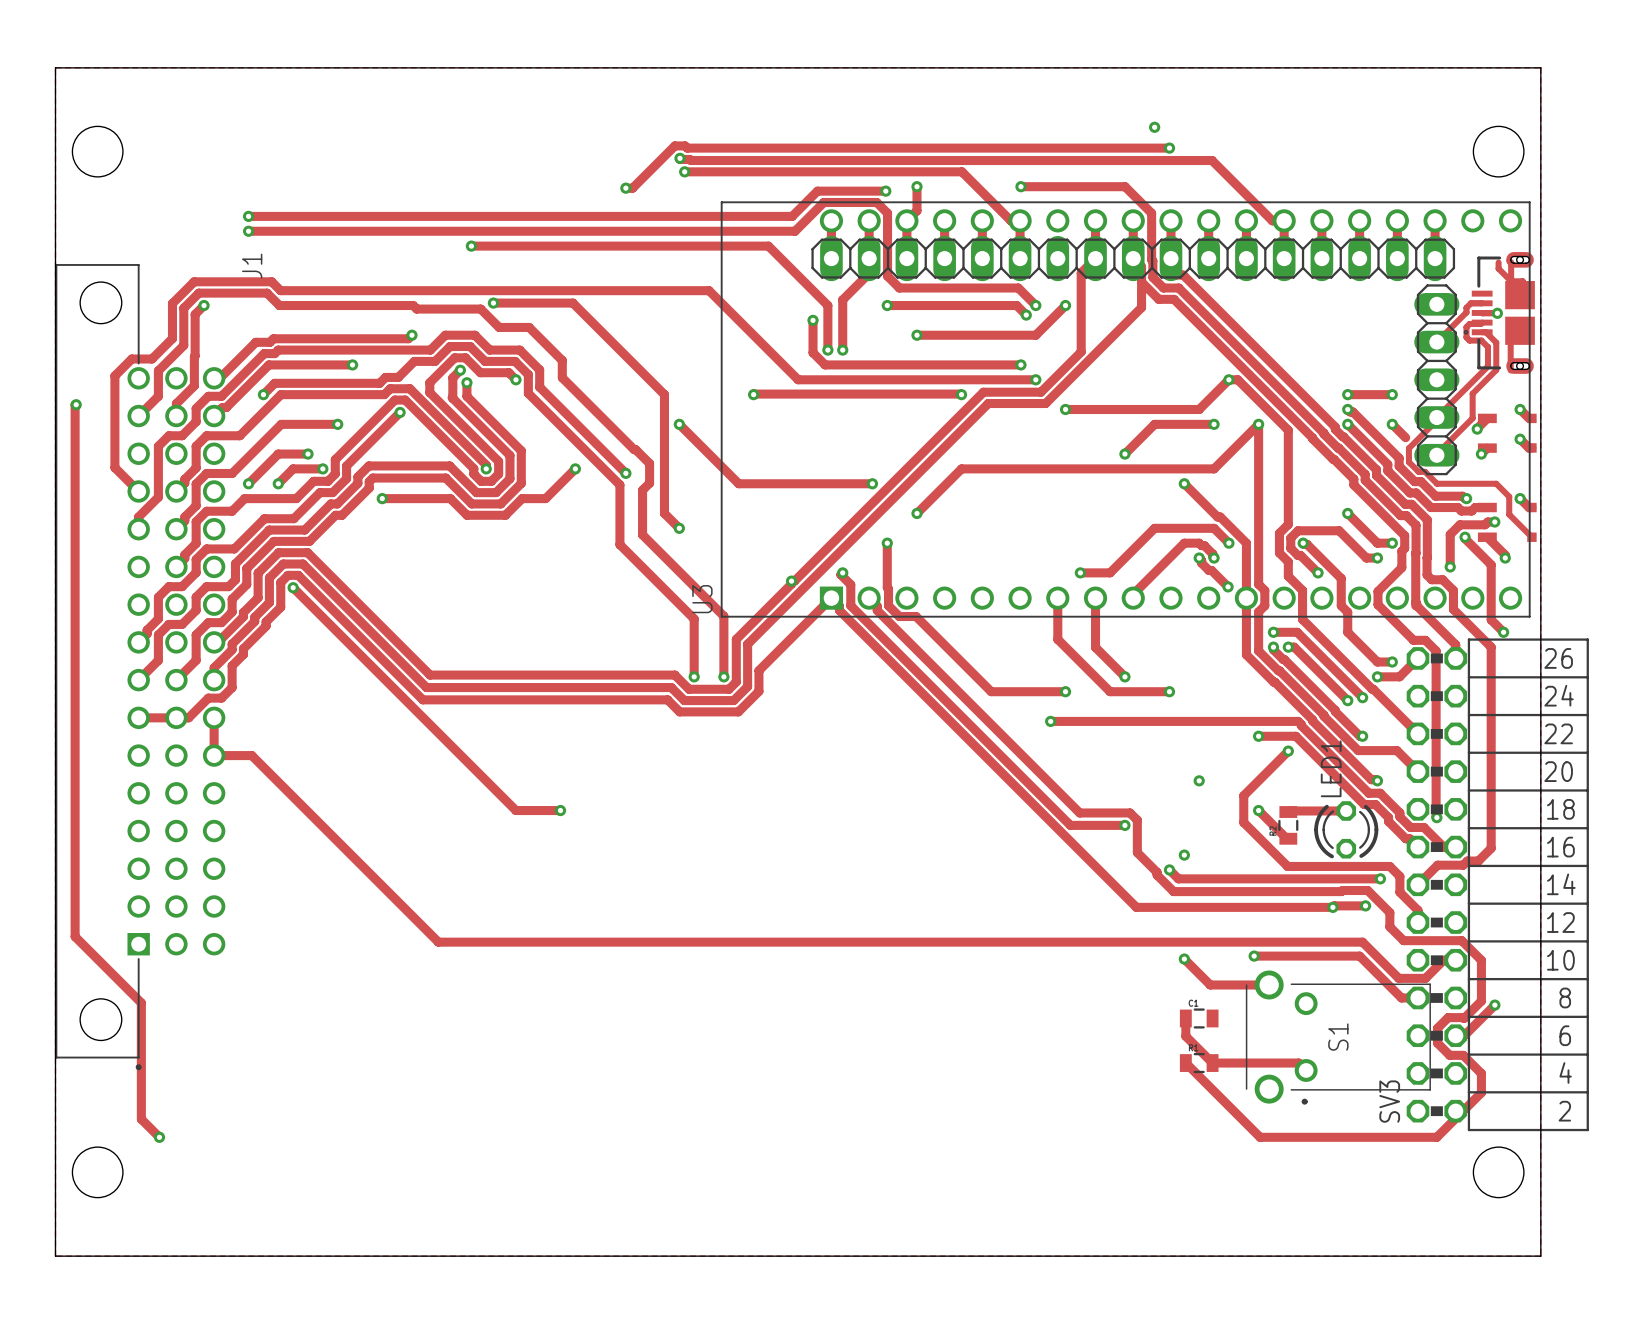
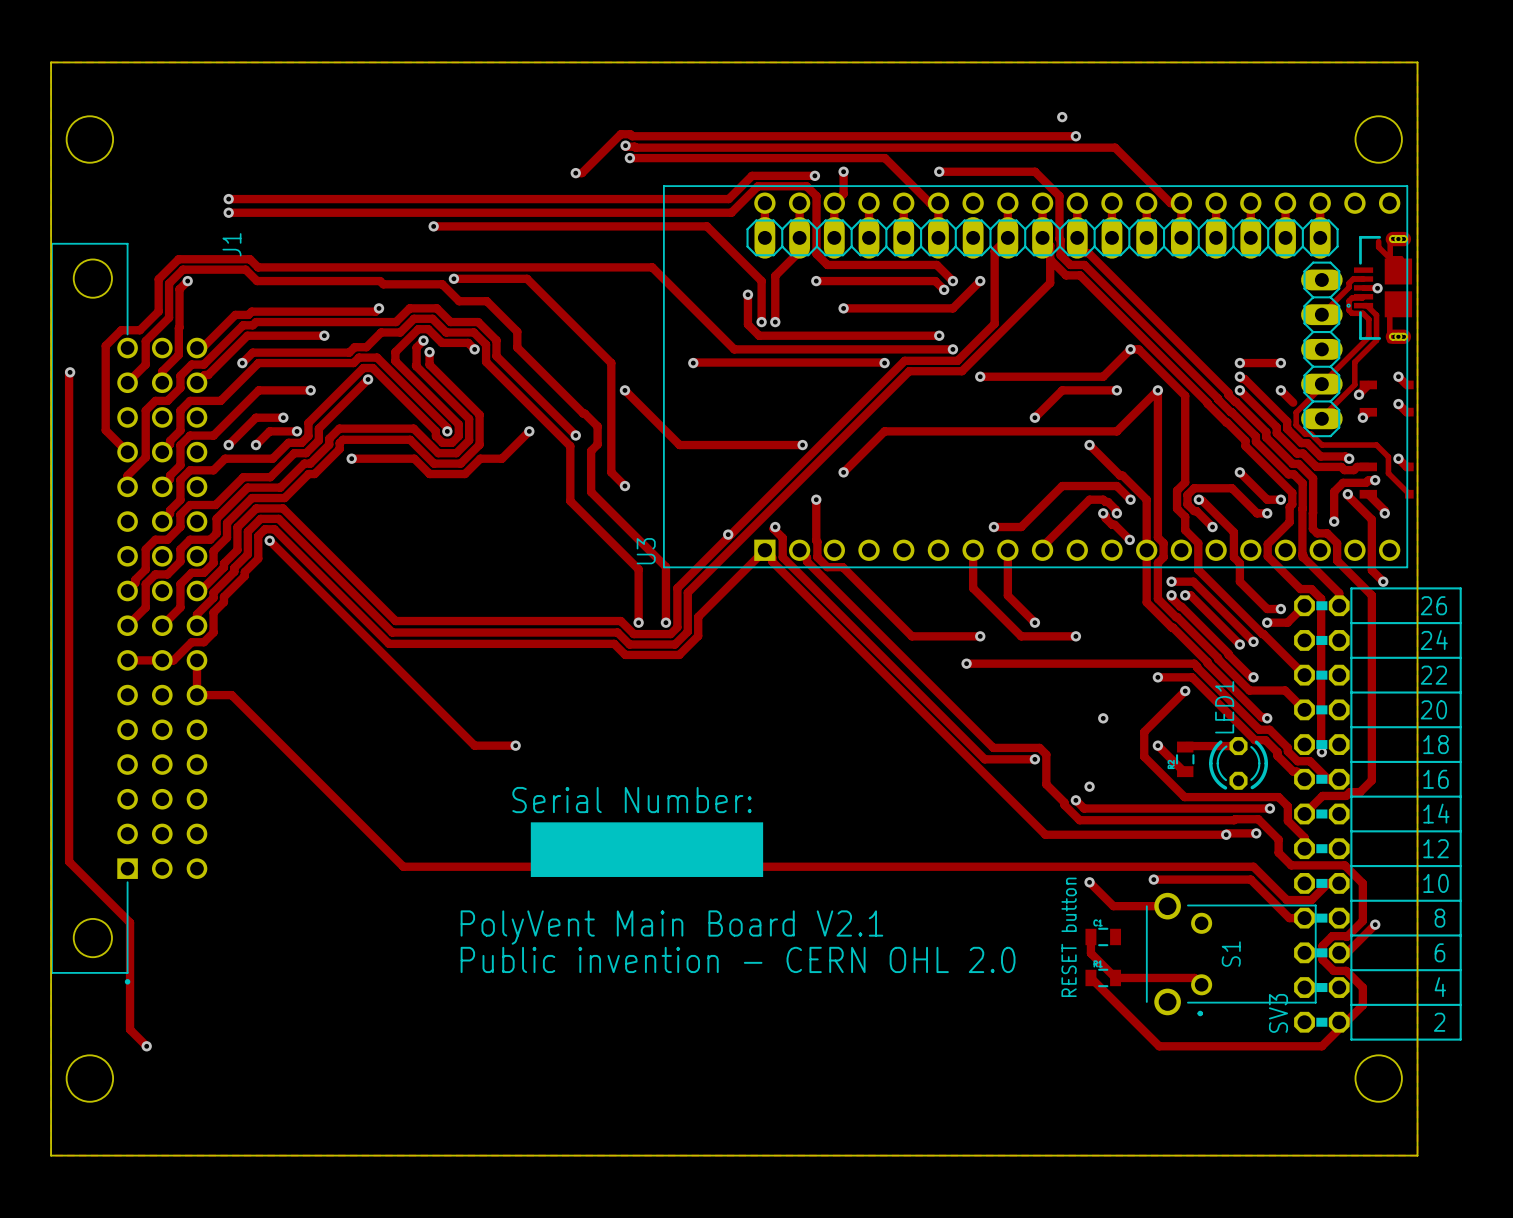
text: none -> Serial Number: (632, 800)
drawing: none -> [530, 822, 764, 877]
text: none -> PolyVent Main Board V2.1 (671, 927)
text: none -> RESET button (1069, 937)
text: none -> Public invention - CERN OHL 2.0 (738, 959)

